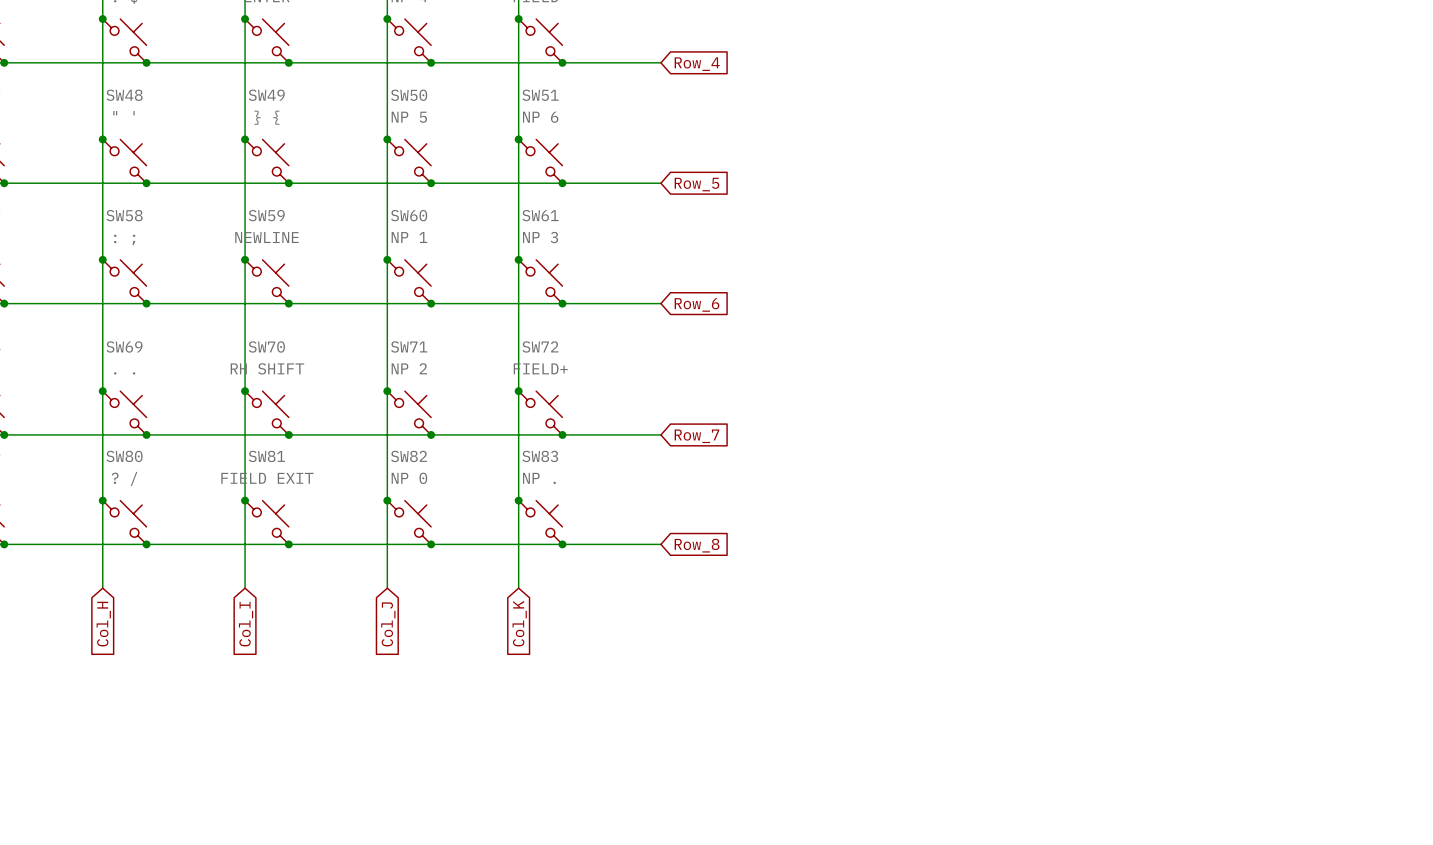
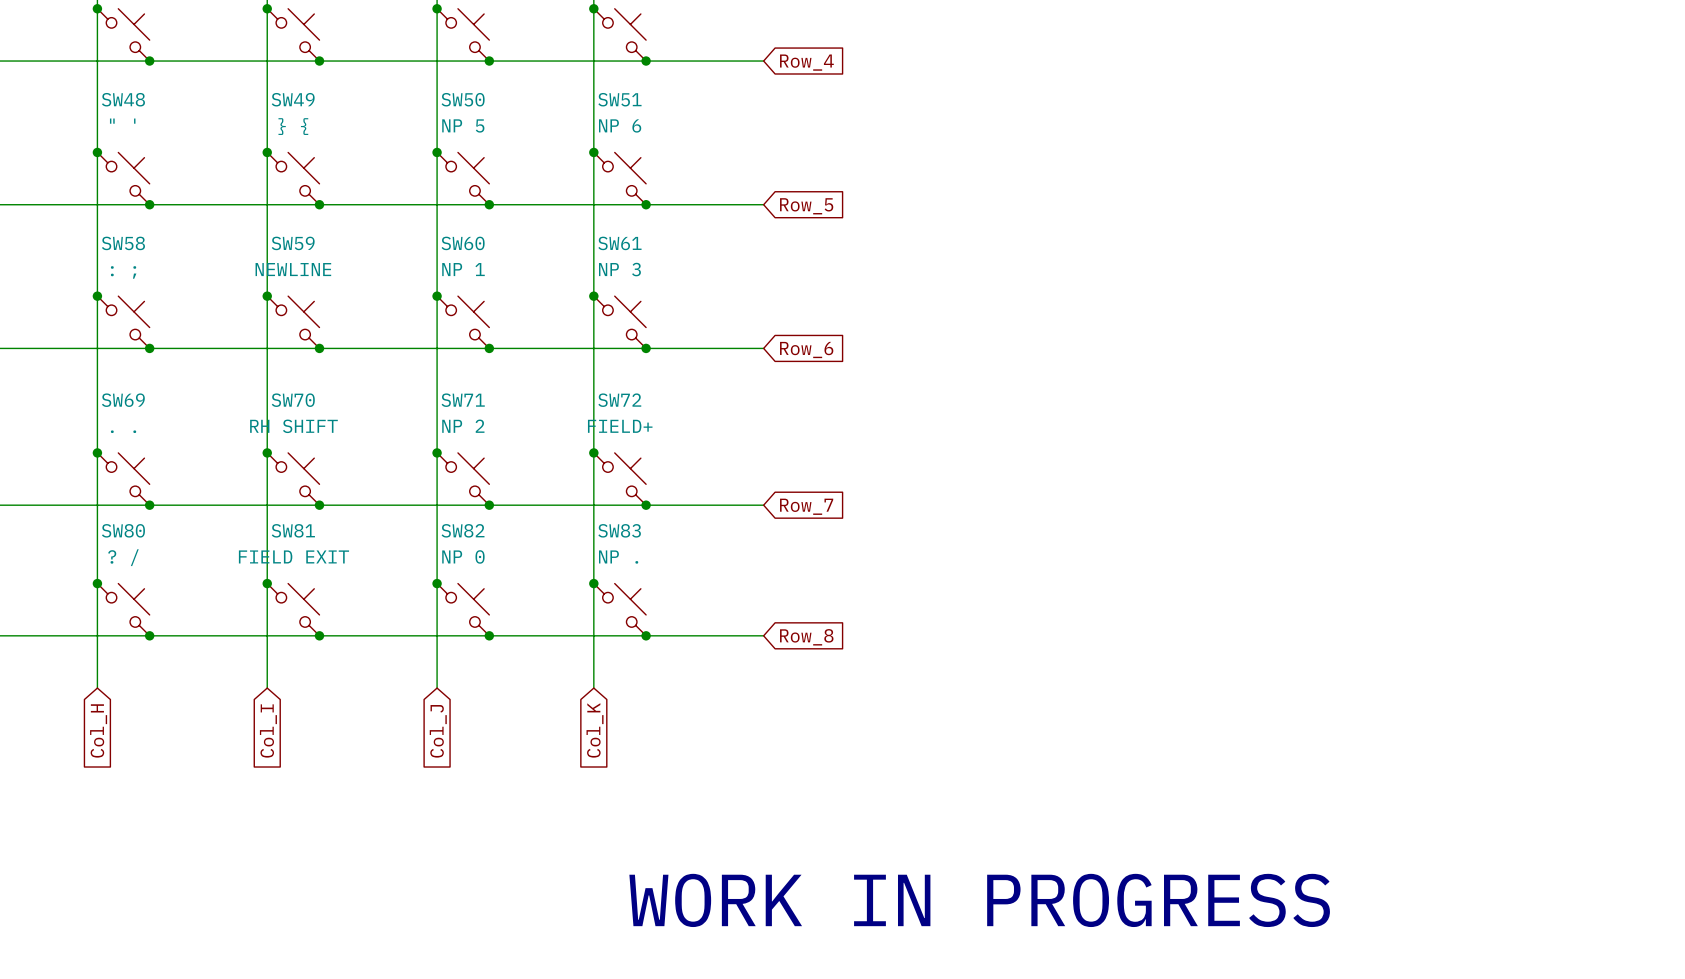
text: none -> WORK IN PROGRESS (979, 900)

